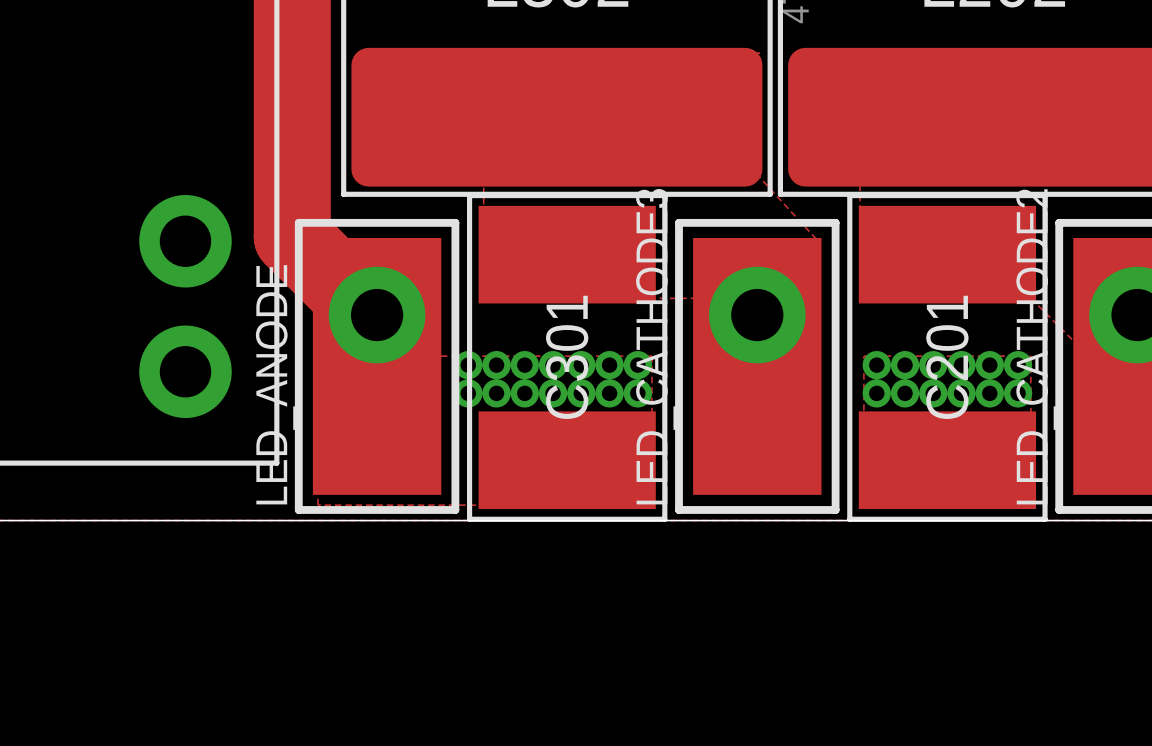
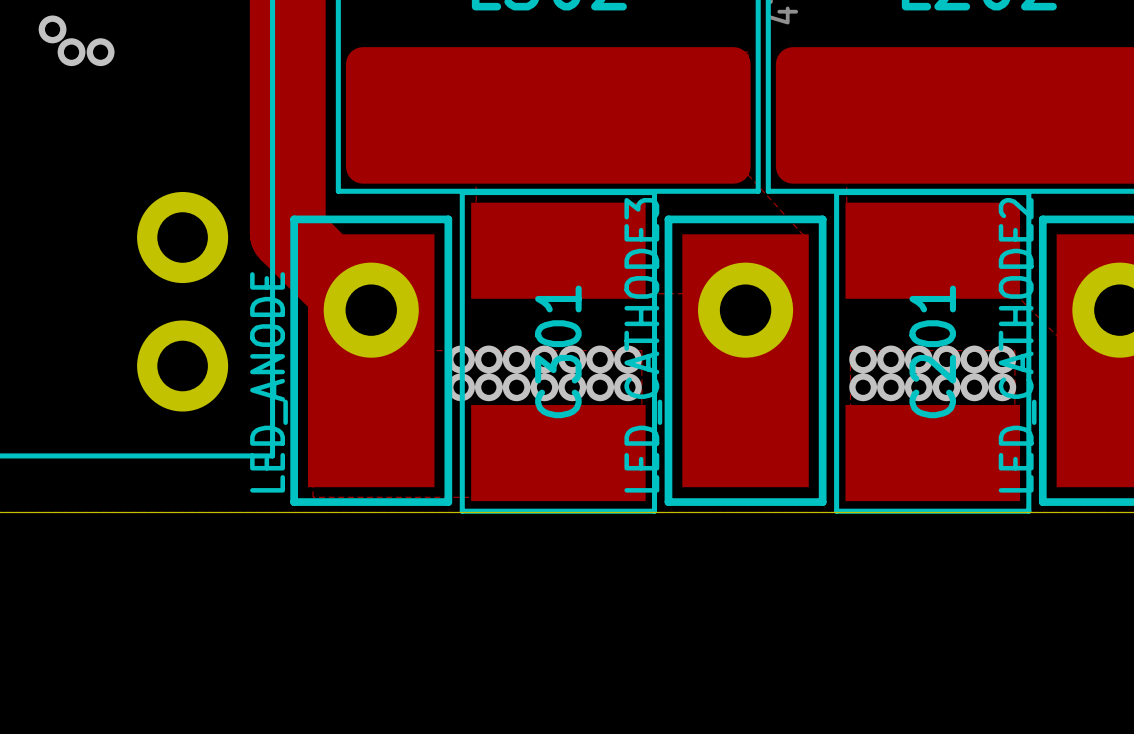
via: none -> (52, 29)
via: none -> (71, 52)
via: none -> (100, 52)

